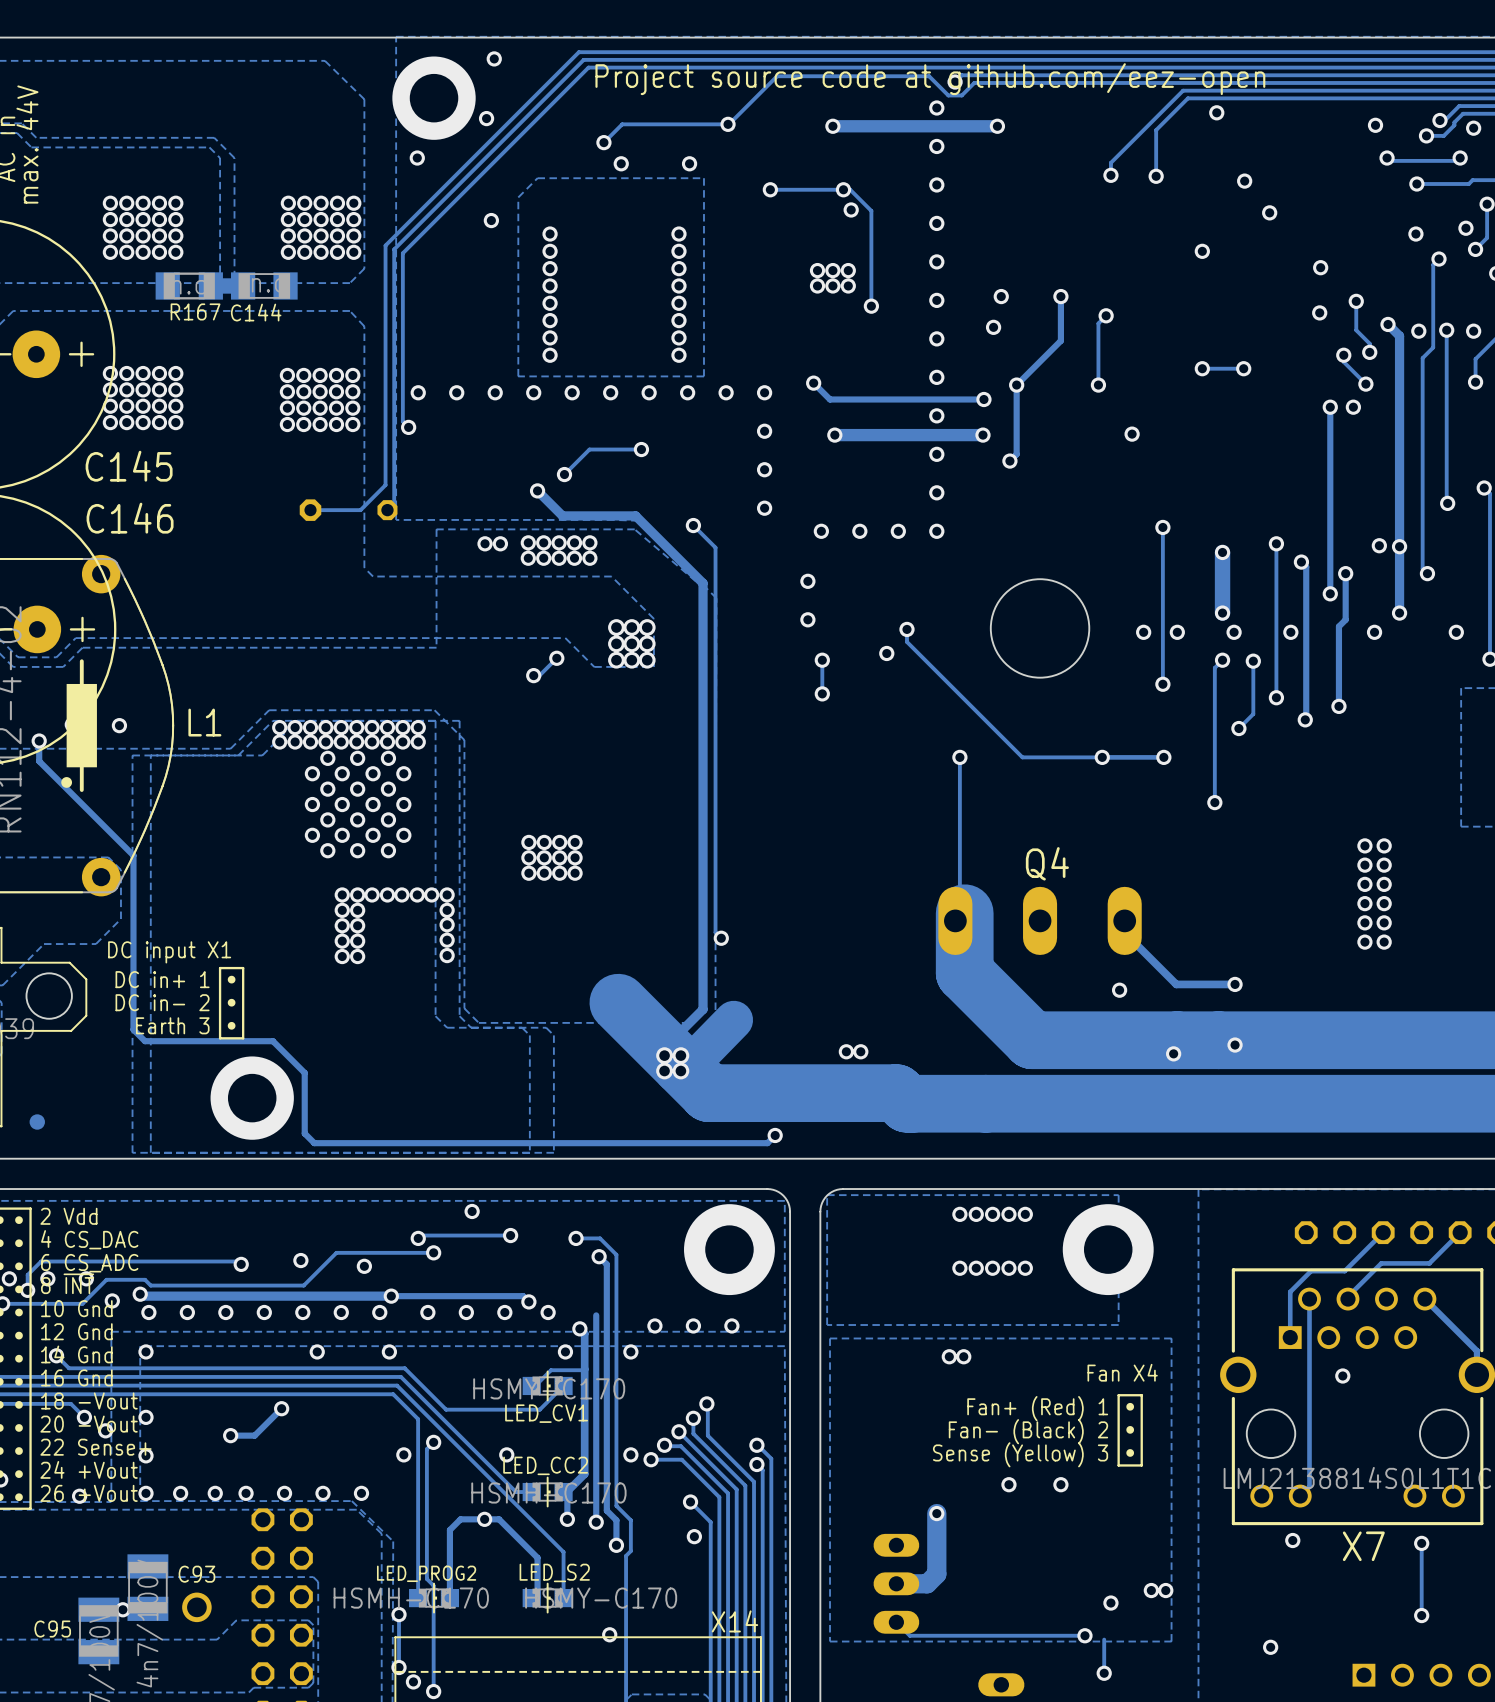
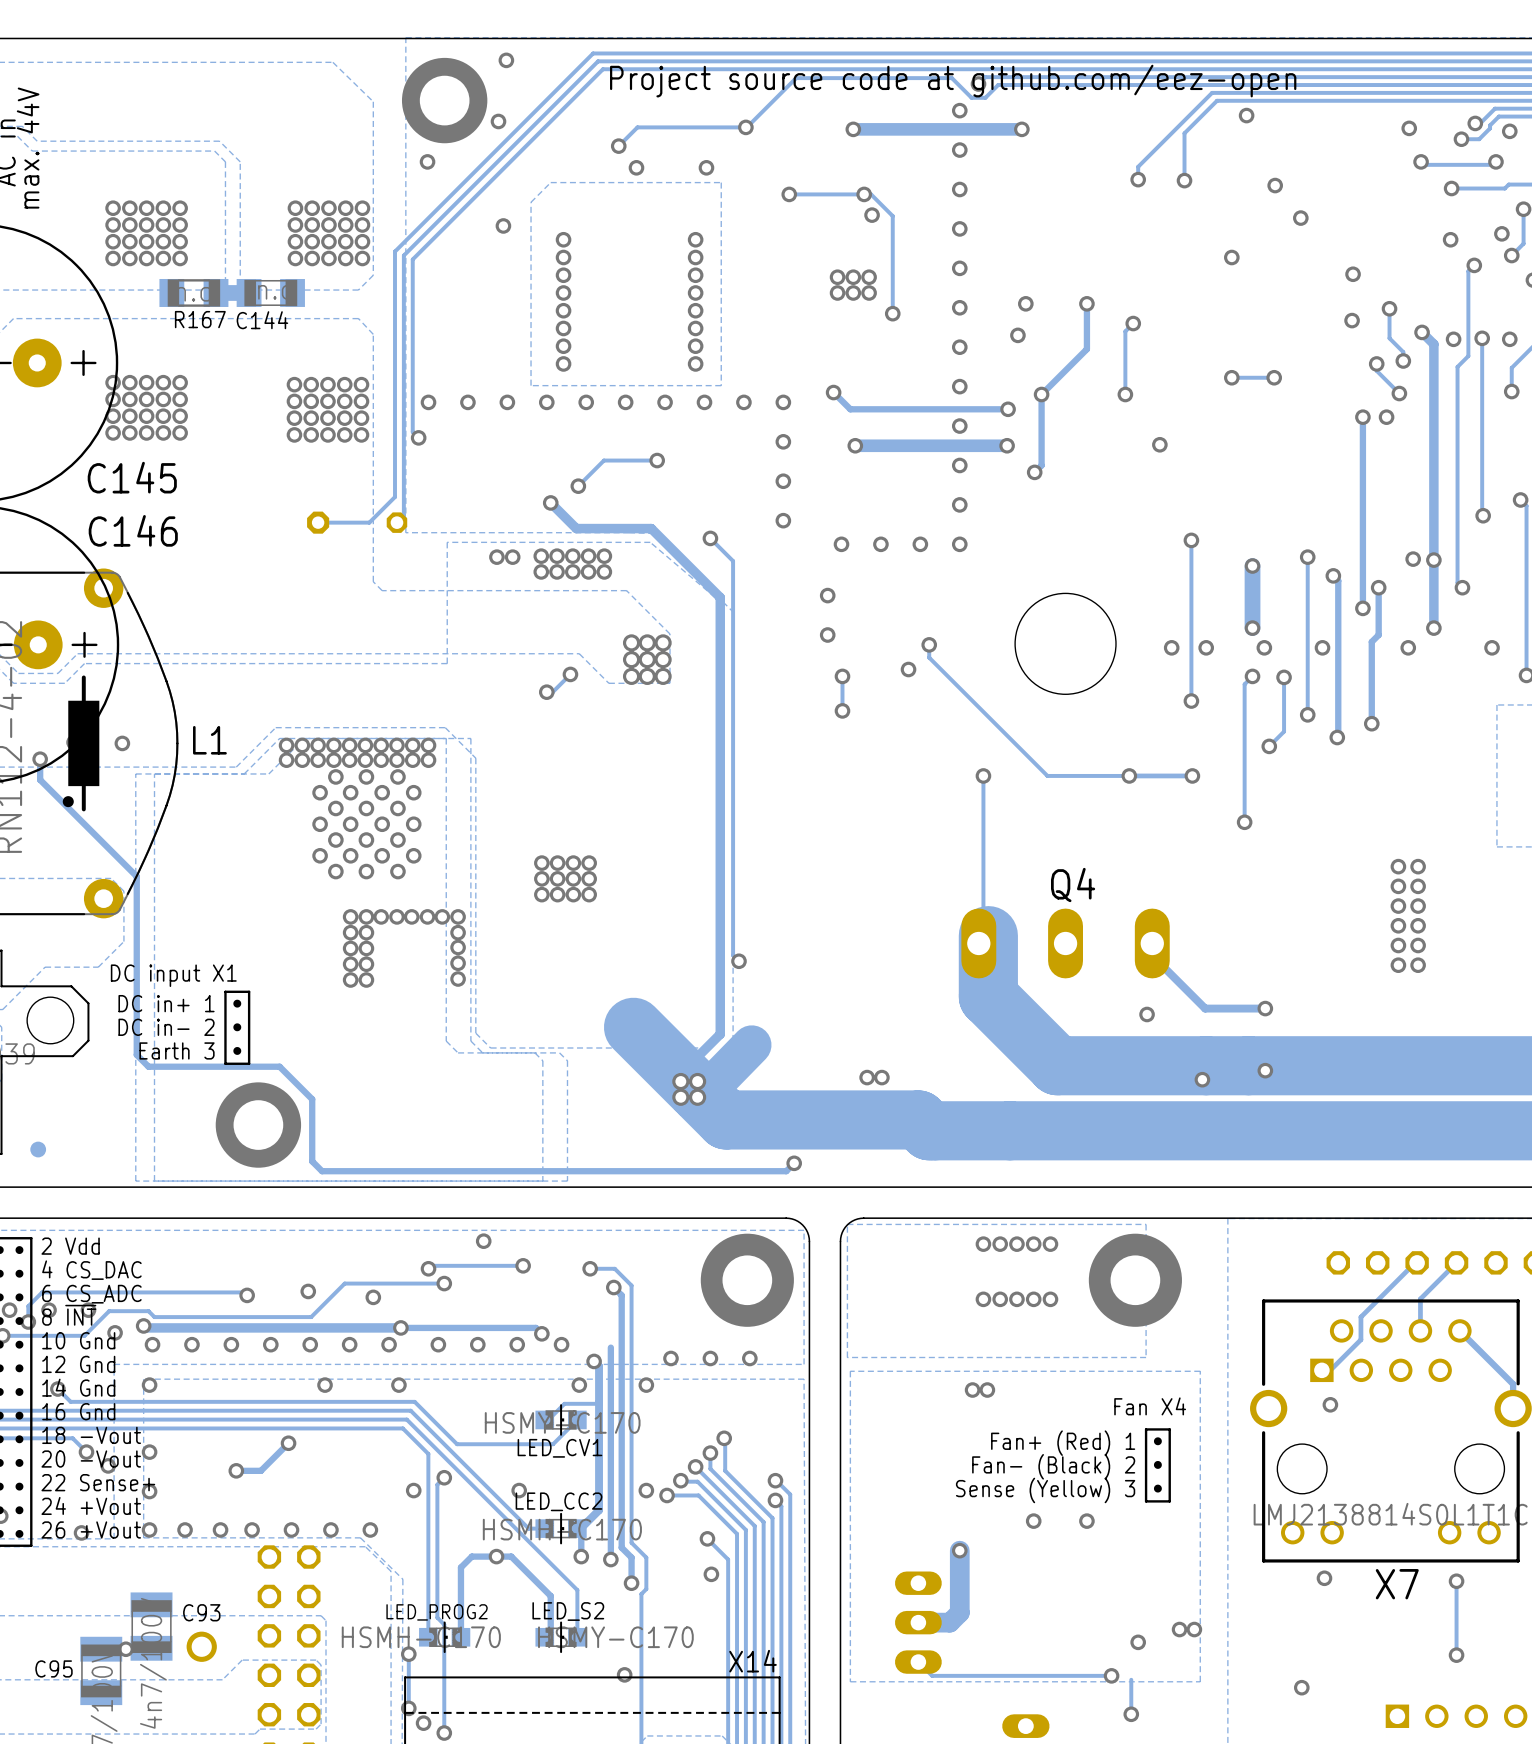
track: (1383, 1232) (1344, 1271) (1311, 1271) (1290, 1291) (1290, 1337) -> (1417, 1262) (1360, 1317) (1360, 1339) (1330, 1370) (1321, 1370)
track: none -> (1456, 1262) (1420, 1298) (1420, 1330)
track: (1460, 1232) (1429, 1263) (1381, 1263) (1347, 1296) (1347, 1299) -> none
track: (1309, 1299) (1309, 1486) (1300, 1496) -> none
via position: (1342, 1375) -> (1330, 1404)

